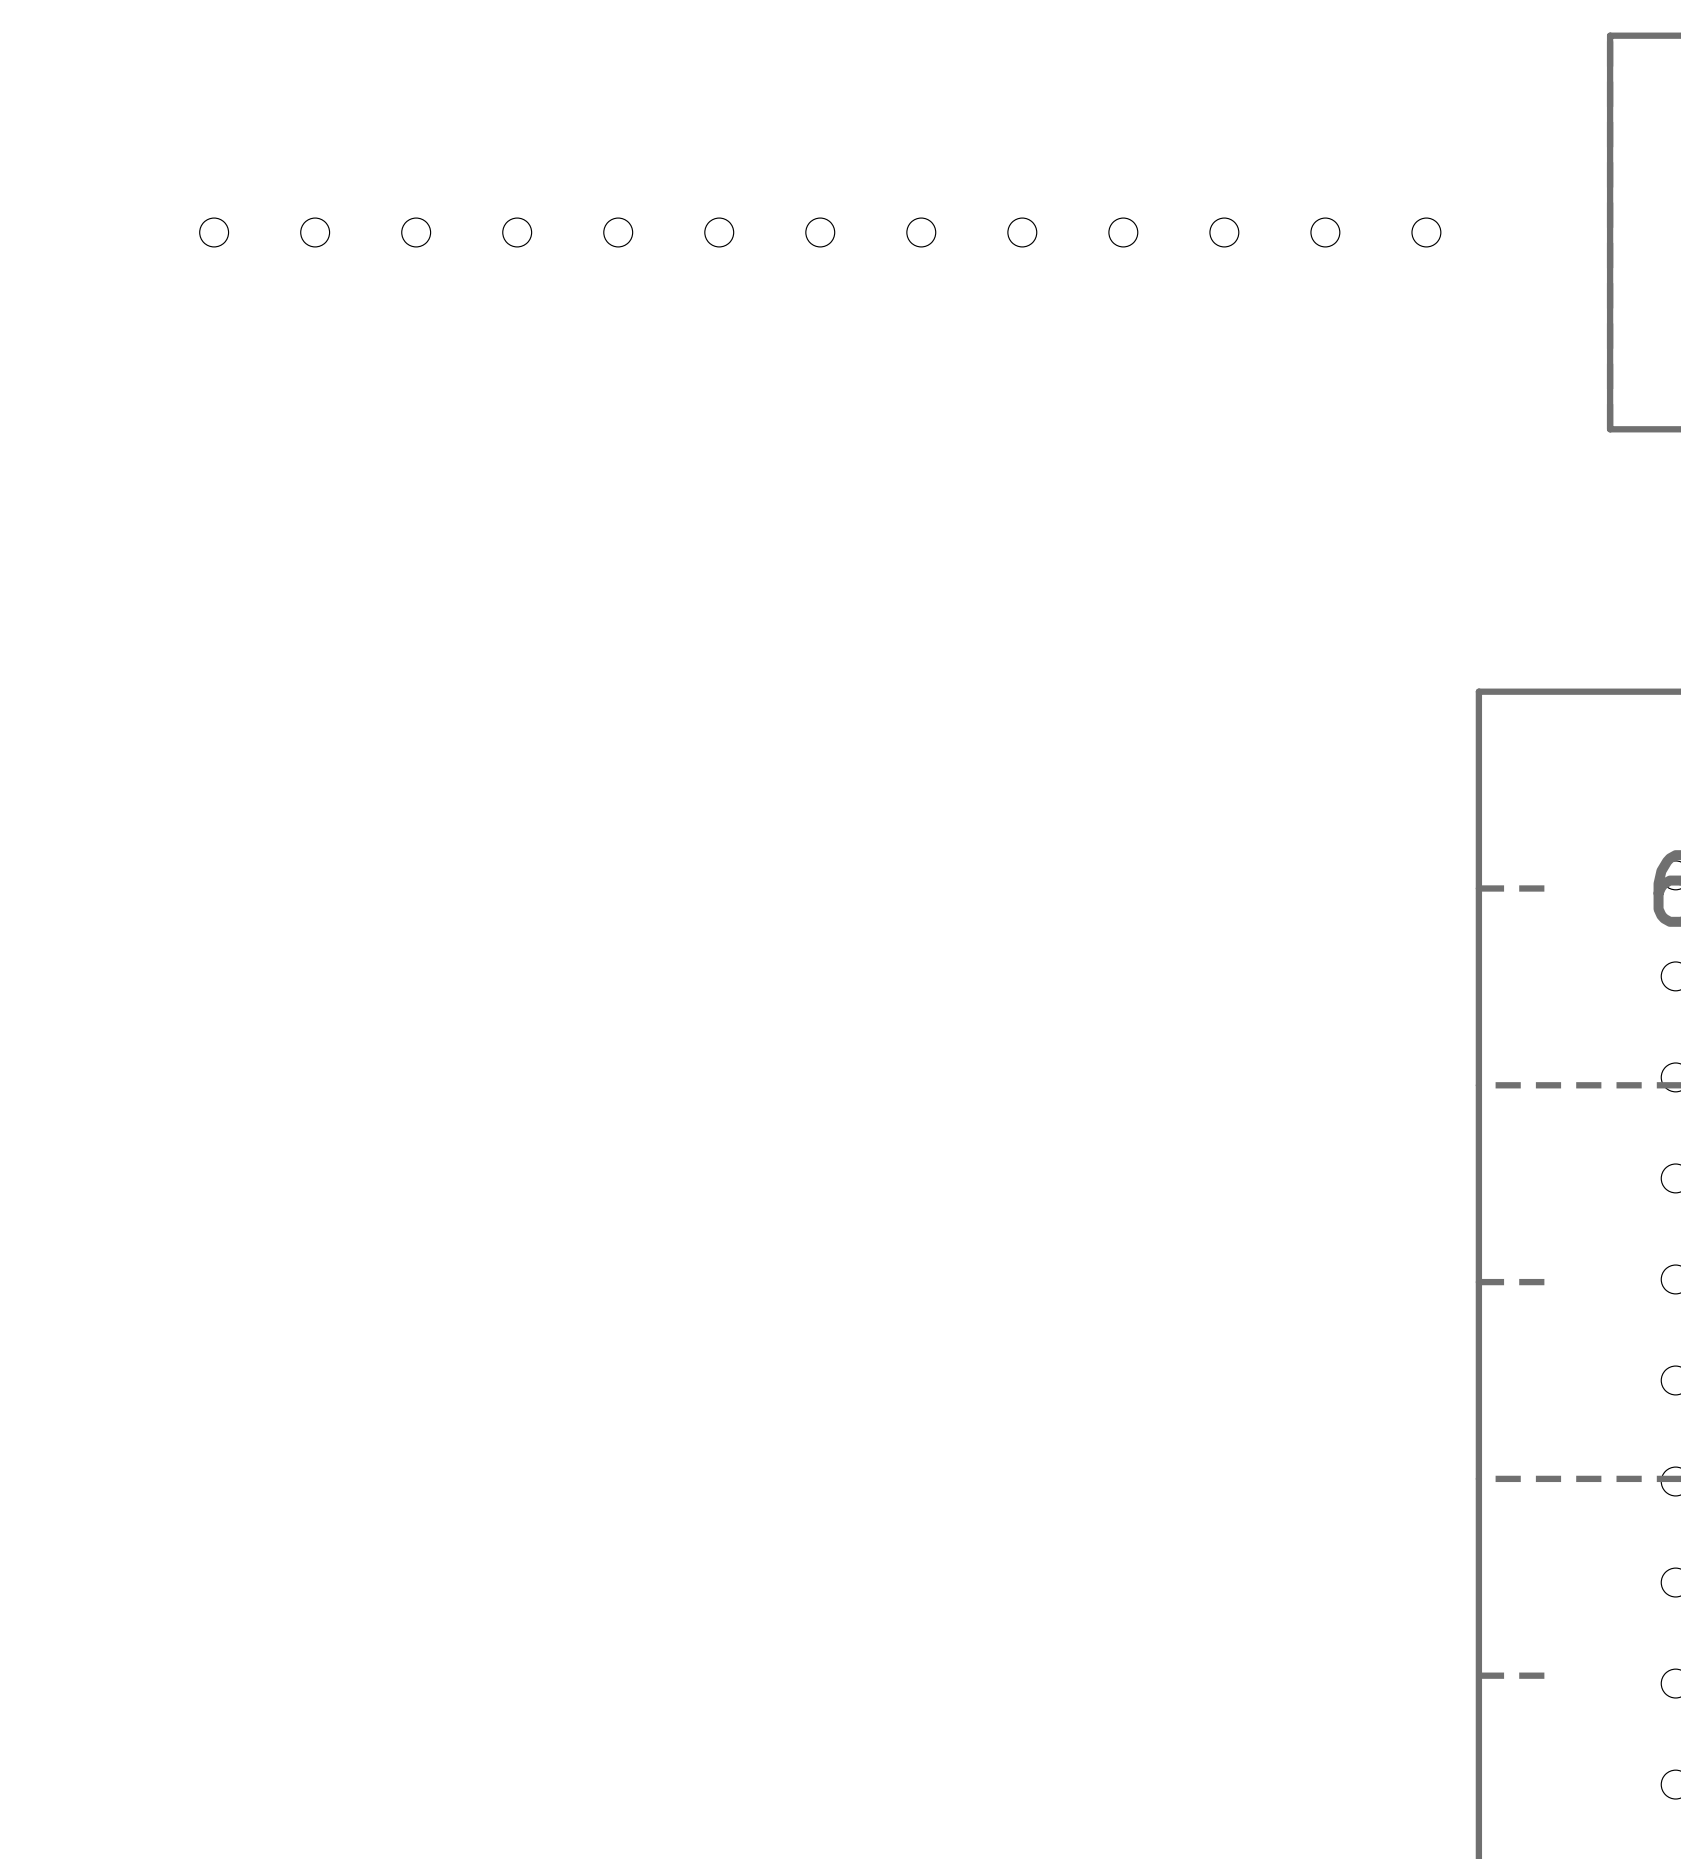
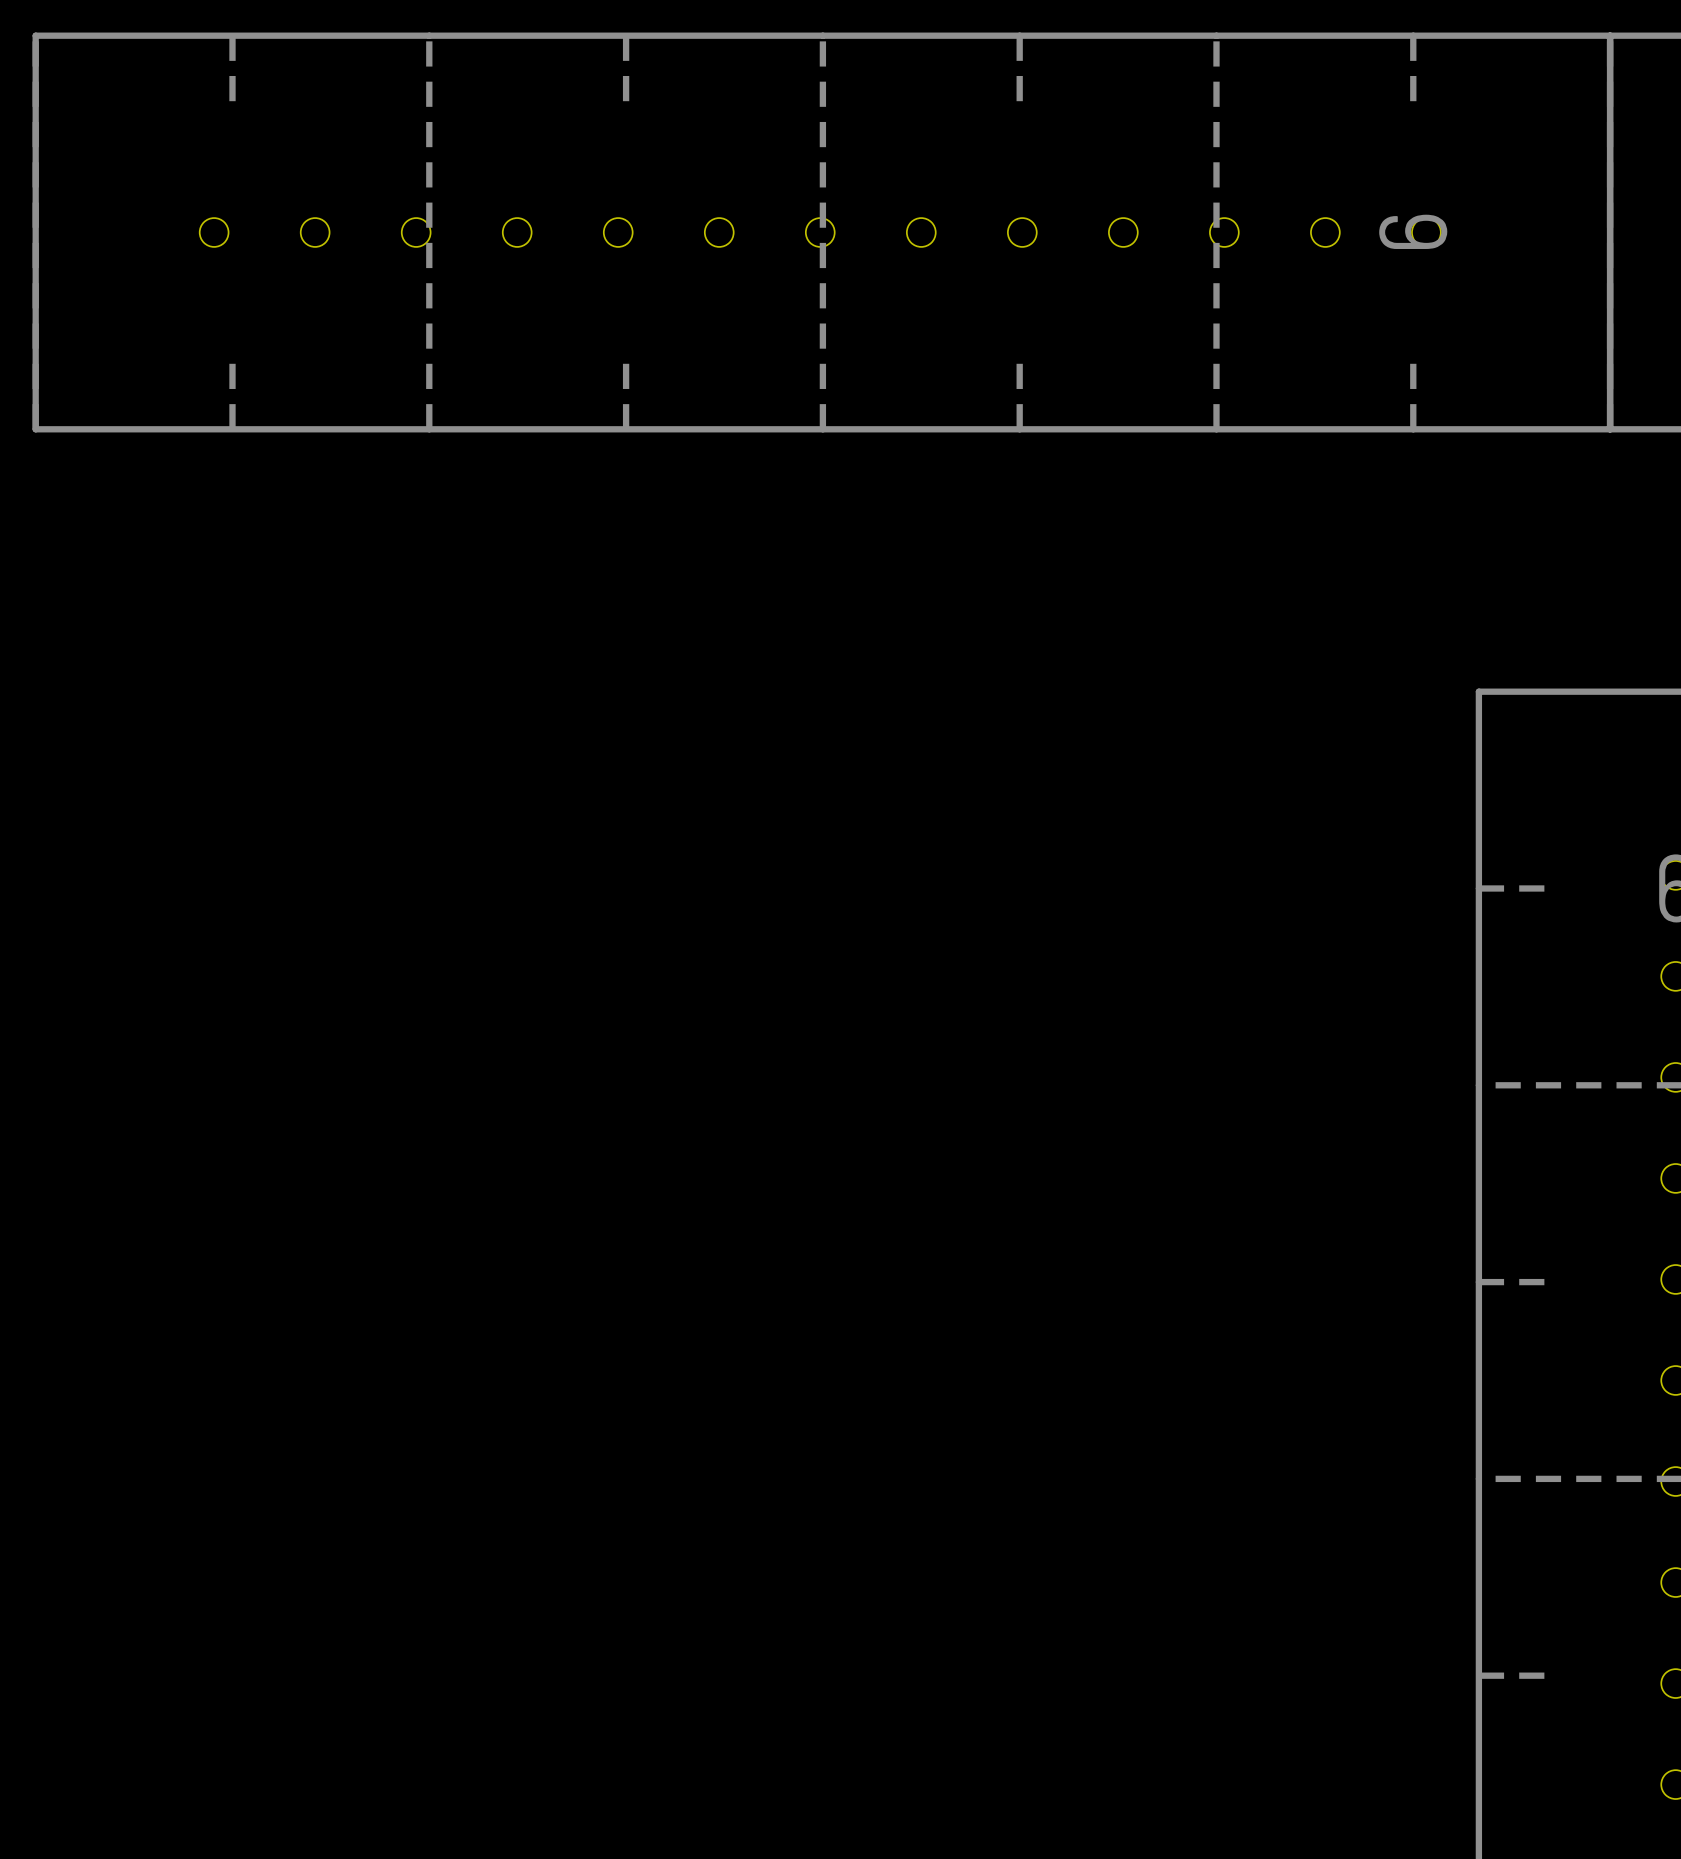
drawing: none -> [32, 32, 1614, 433]

